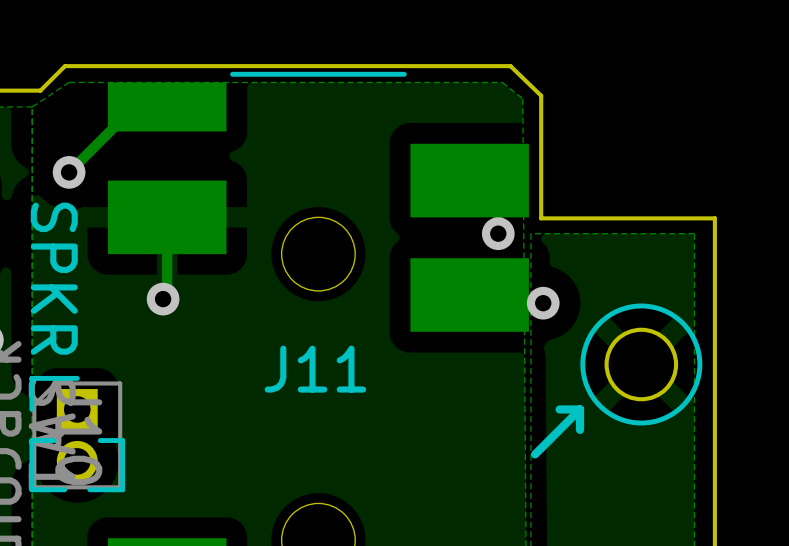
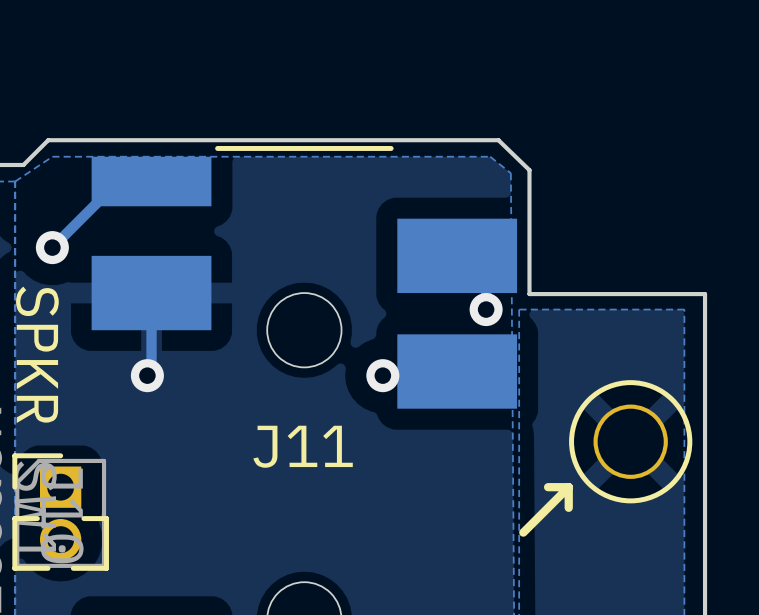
via position: (543, 303) -> (382, 375)

